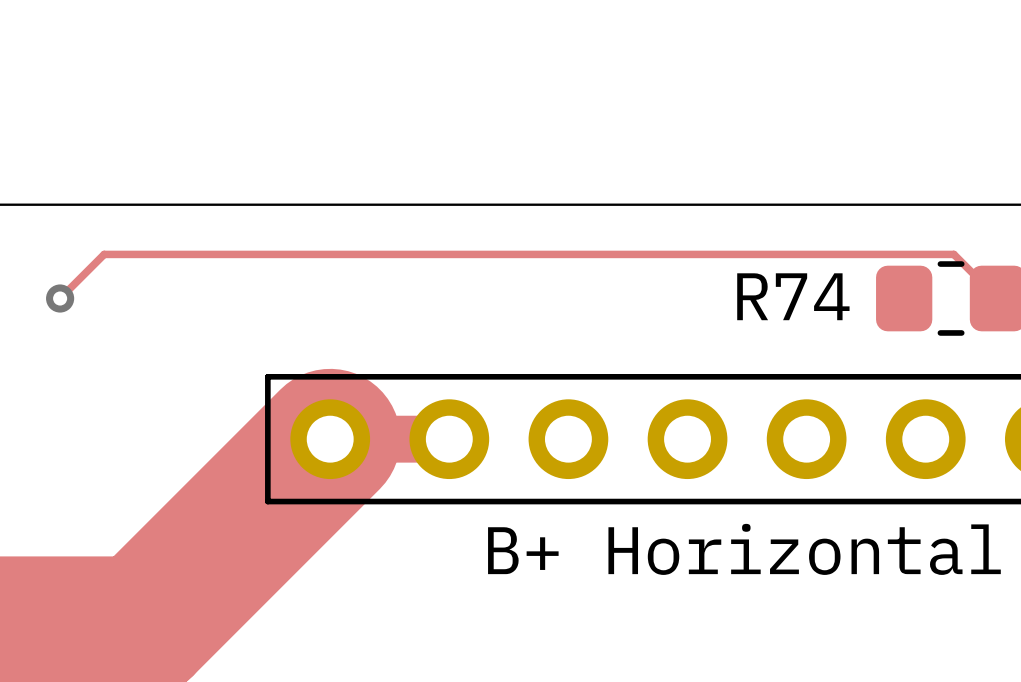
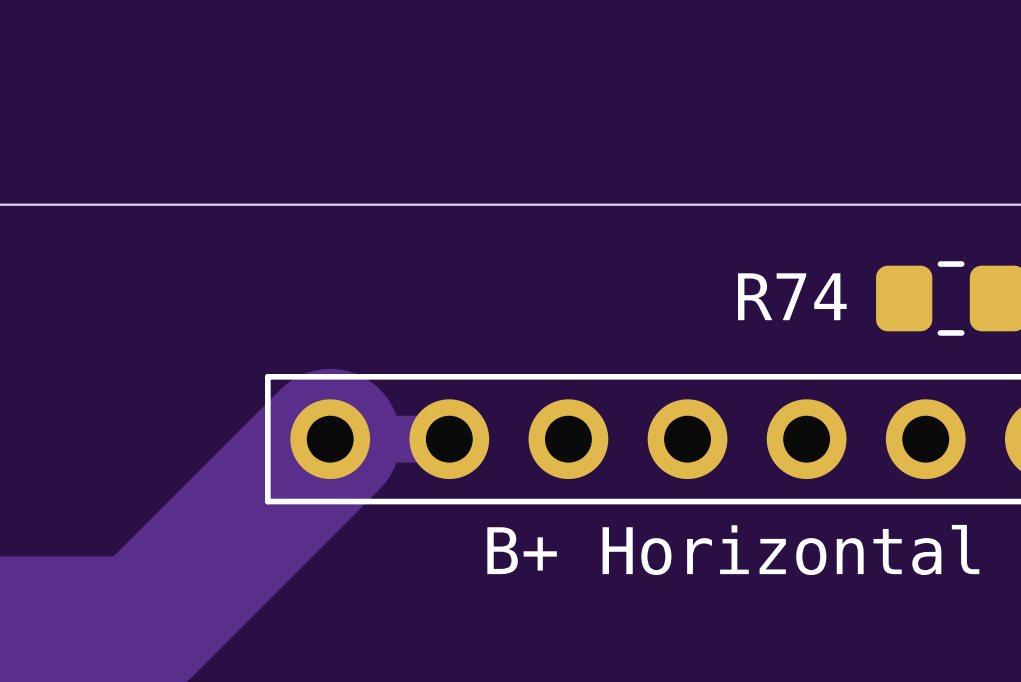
track: (60, 298) (104, 254) (953, 254) (997, 298) -> none
via: (60, 298) -> none

